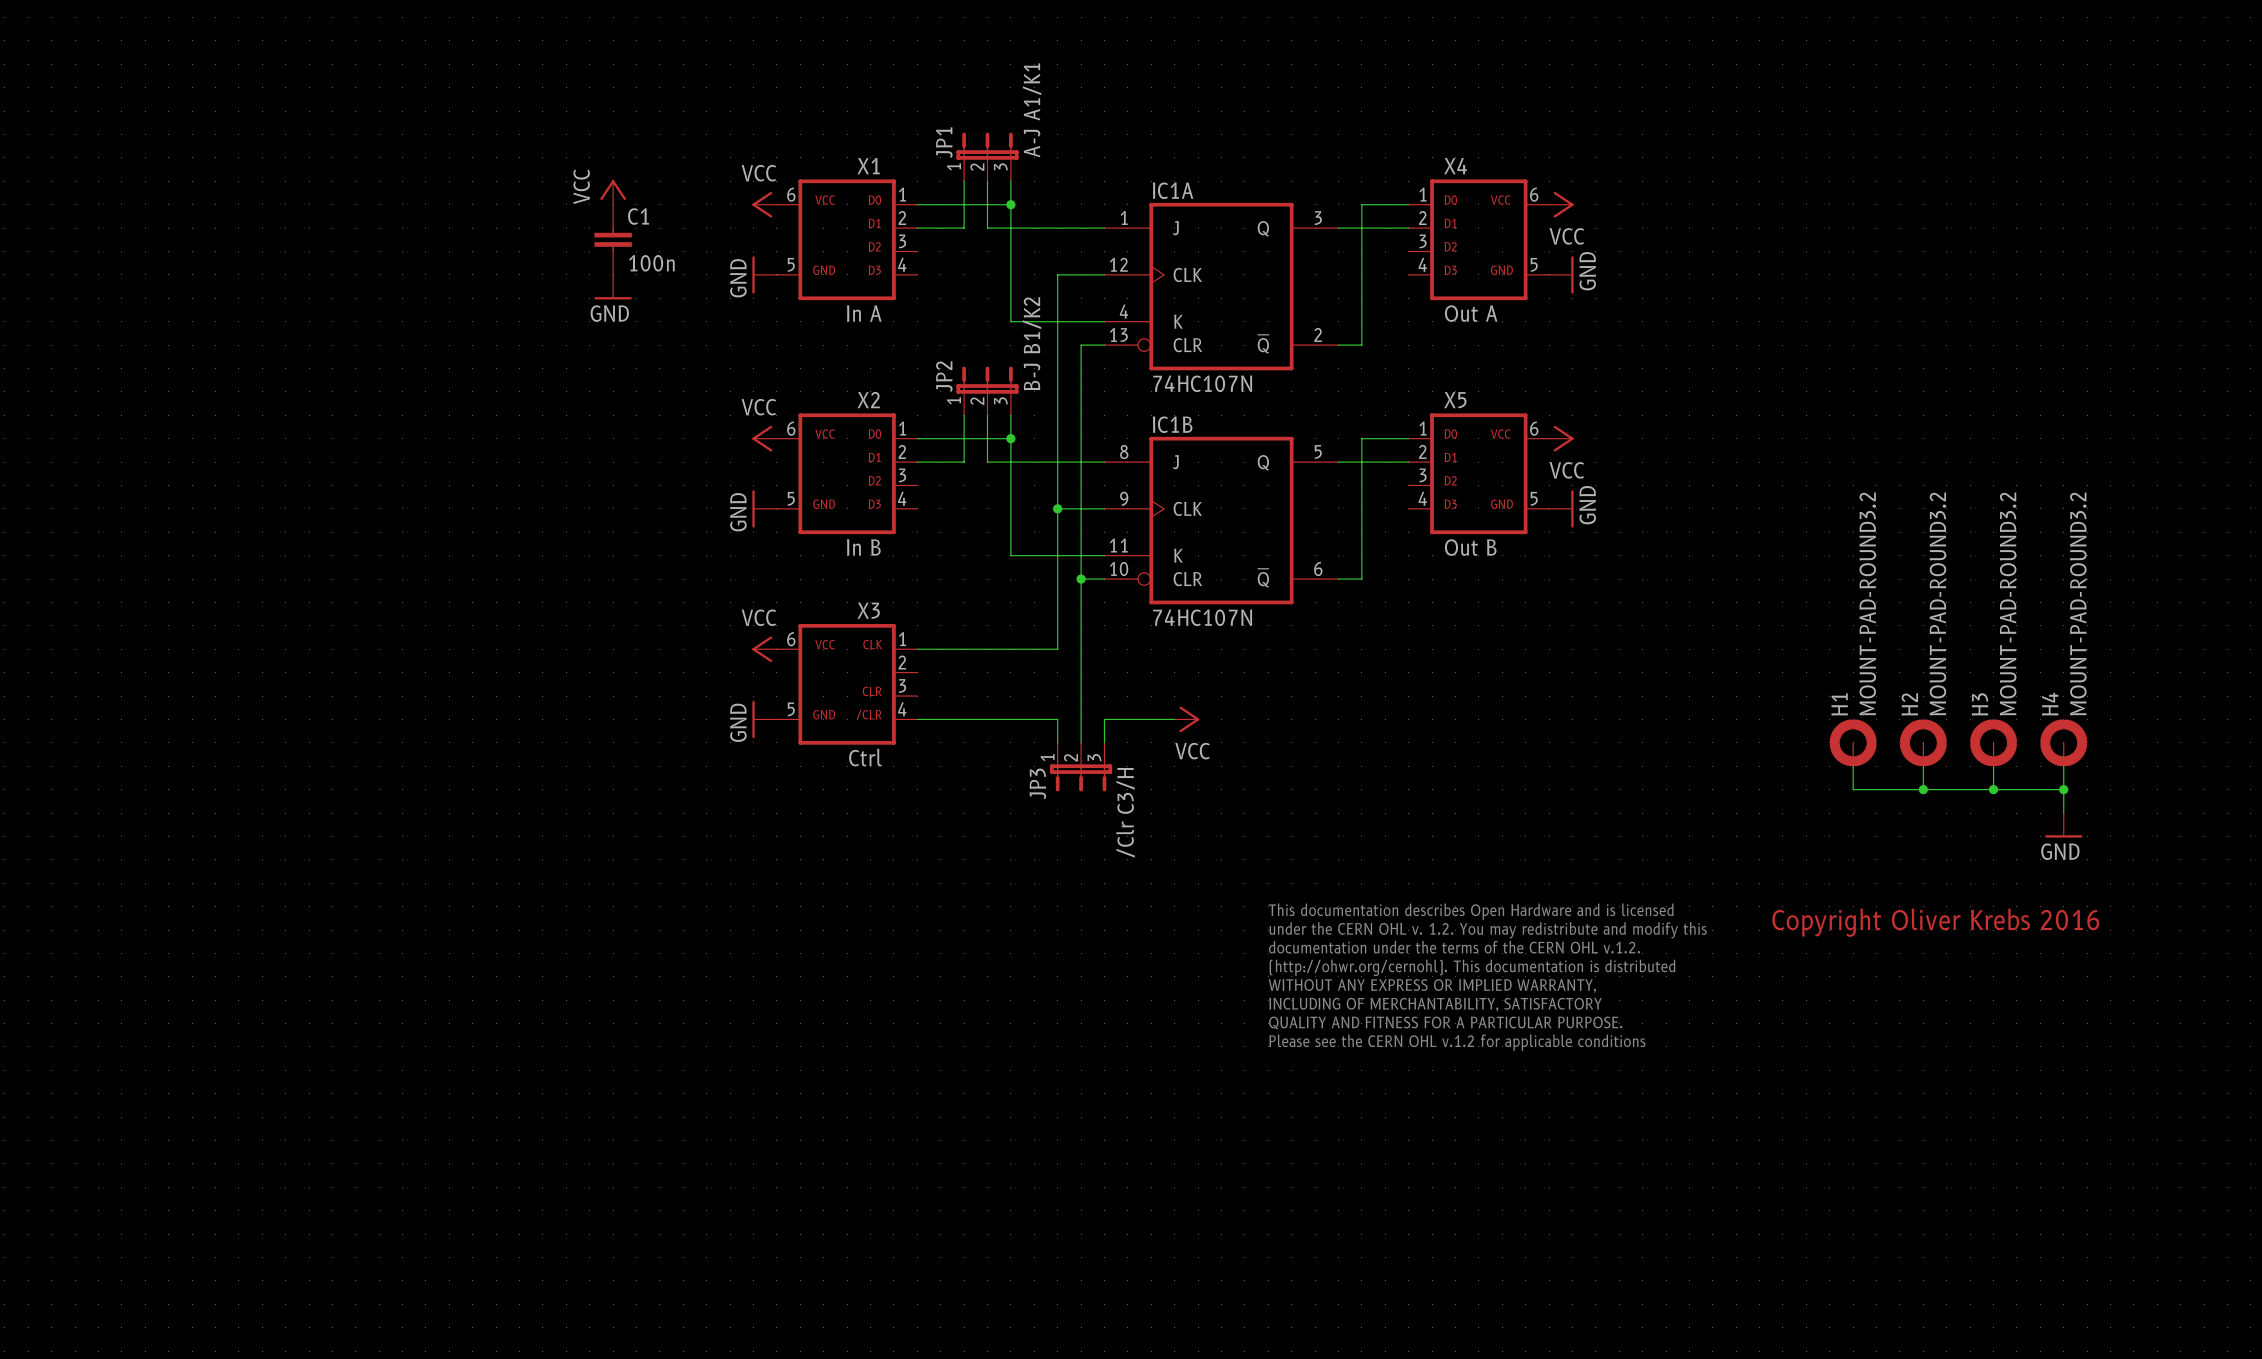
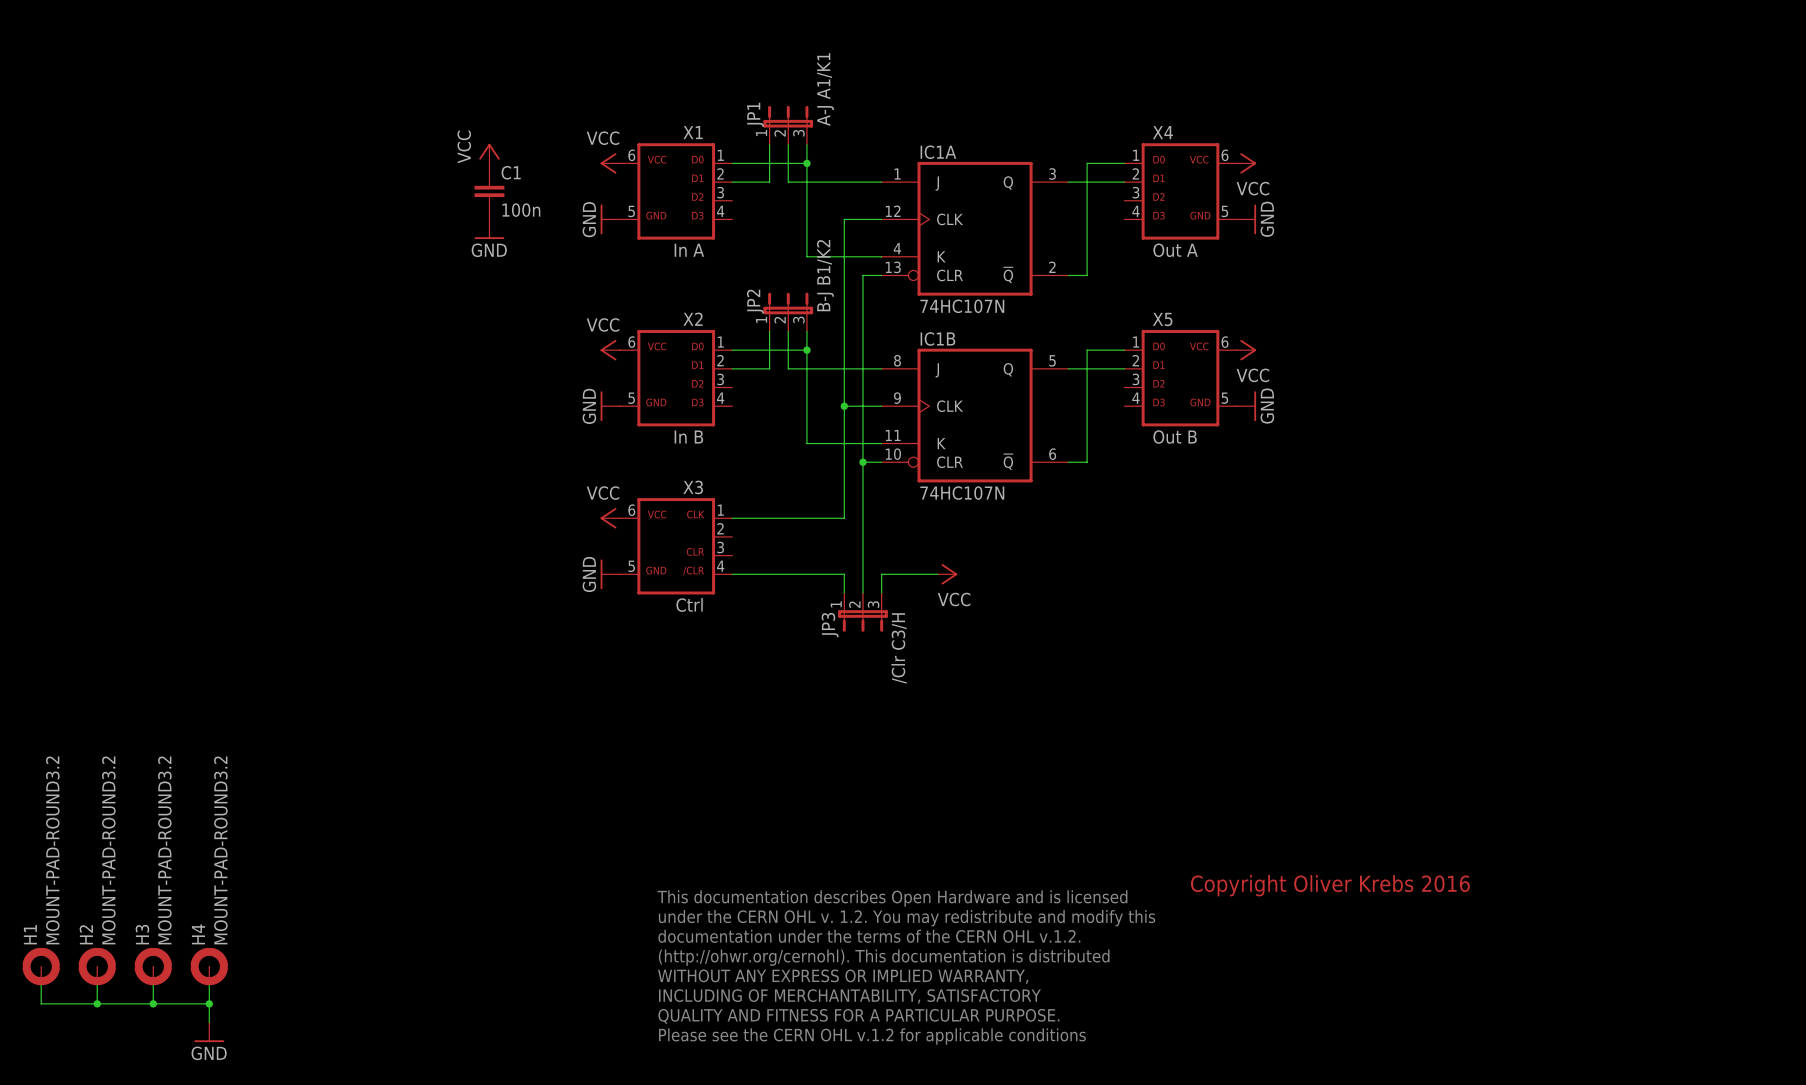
H1 position: (1853, 742) -> (41, 966)
H2 position: (1923, 742) -> (97, 966)
H3 position: (1993, 742) -> (153, 966)
H4 position: (2063, 742) -> (209, 966)
wire: (1853, 766) (1853, 789) (2063, 789) -> none
wire: (1923, 766) (1923, 789) -> none
wire: (1993, 766) (1993, 789) -> none
wire: (2063, 766) (2063, 813) -> none
junction: (1923, 789) -> none
junction: (1993, 789) -> none
junction: (2063, 789) -> none
power symbol: GND (2063, 825) -> none
text: This documentation describes Open Hardware and is licensed (1471, 911) -> none
text: Copyright Oliver Krebs 2016 (1935, 922) -> none
text: under the CERN OHL v. 1.2. You may redistribute and modify this (1488, 930) -> none
text: documentation under the terms of the CERN OHL v.1.2. (1454, 947) -> none
text: (http://ohwr.org/cernohl). This documentation is distributed (1472, 967) -> none
text: WITHOUT ANY EXPRESS OR IMPLIED WARRANTY, (1432, 986) -> none
text: INCLUDING OF MERCHANTABILITY, SATISFACTORY (1435, 1004) -> none
text: QUALITY AND FITNESS FOR A PARTICULAR PURPOSE. (1445, 1022) -> none
text: Please see the CERN OHL v.1.2 for applicable conditions (1457, 1042) -> none
text: none -> Copyright Oliver Krebs 2016 (1330, 885)
text: none -> This documentation describes Open Hardware and is licensed (892, 898)
text: none -> under the CERN OHL v. 1.2. You may redistribute and modify this (907, 918)
text: none -> documentation under the terms of the CERN OHL v.1.2. (869, 936)
text: none -> (http://ohwr.org/cernohl). This documentation is distributed (884, 957)
text: none -> WITHOUT ANY EXPRESS OR IMPLIED WARRANTY, (843, 976)
wire: none -> (41, 985) (41, 1003) (209, 1003)
wire: none -> (97, 985) (97, 1003)
wire: none -> (153, 985) (153, 1003)
wire: none -> (209, 985) (209, 1022)
text: none -> INCLUDING OF MERCHANTABILITY, SATISFACTORY (849, 996)
junction: none -> (97, 1003)
junction: none -> (153, 1003)
junction: none -> (209, 1003)
text: none -> QUALITY AND FITNESS FOR A PARTICULAR PURPOSE. (858, 1016)
power symbol: none -> GND (209, 1032)
text: none -> Please see the CERN OHL v.1.2 for applicable conditions (872, 1036)

